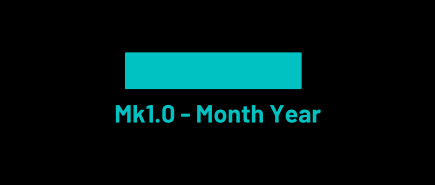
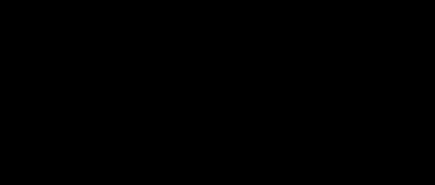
drawing: [124, 52, 302, 90] -> none
text: Mk1.0 - Month Year (218, 113) -> none

